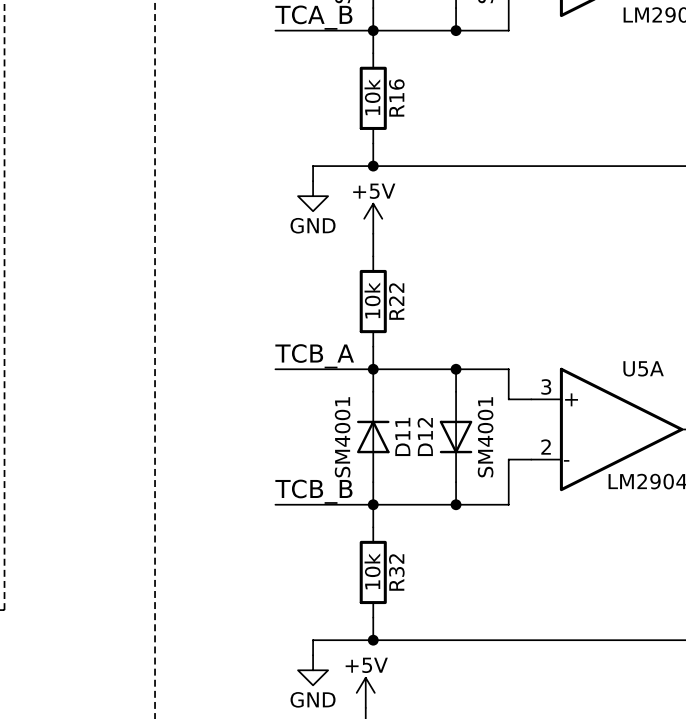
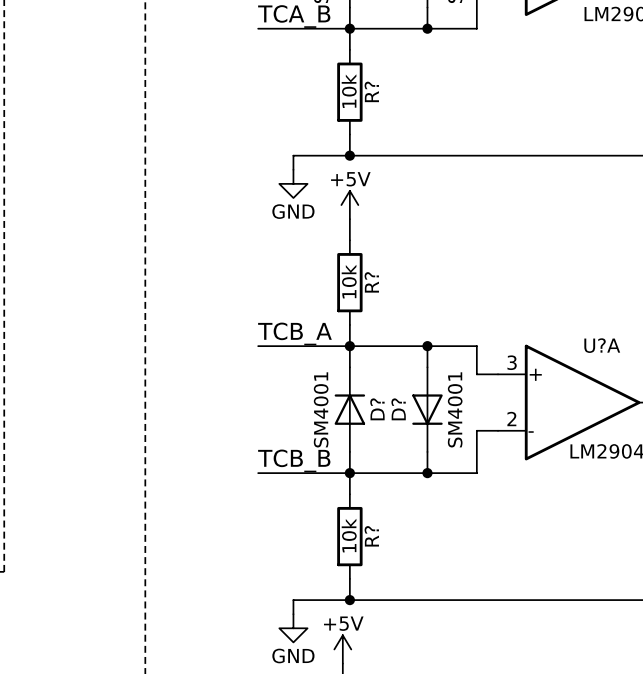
R16 name: R16 (396, 97) -> R? (371, 91)
R22 name: R22 (396, 301) -> R? (371, 282)
U5A name: U5A (643, 368) -> U?A (602, 345)
D11 name: D11 (402, 436) -> D? (377, 409)
D12 name: D12 (425, 437) -> D? (398, 409)
R32 name: R32 (396, 572) -> R? (371, 536)

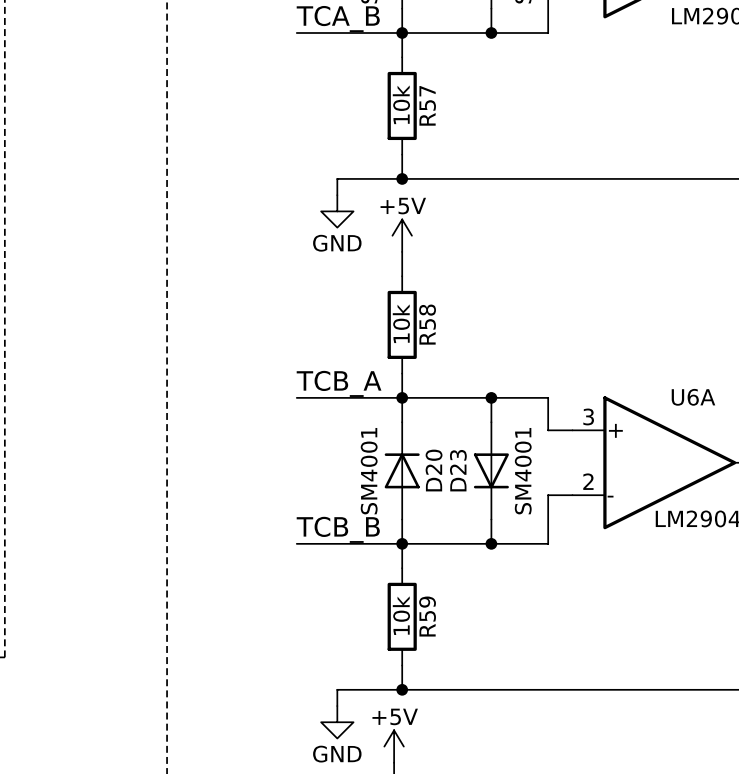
R? name: R? (371, 91) -> R57 (427, 105)
R? name: R? (371, 282) -> R58 (427, 324)
U?A name: U?A (602, 345) -> U6A (693, 397)
D? name: D? (377, 409) -> D20 (434, 470)
D? name: D? (398, 409) -> D23 (458, 470)
R? name: R? (371, 536) -> R59 (427, 616)

